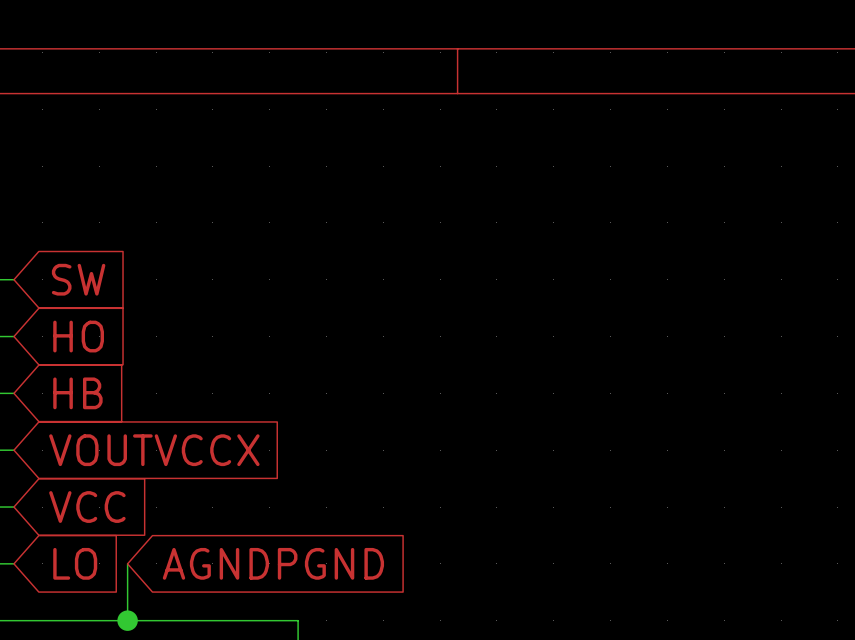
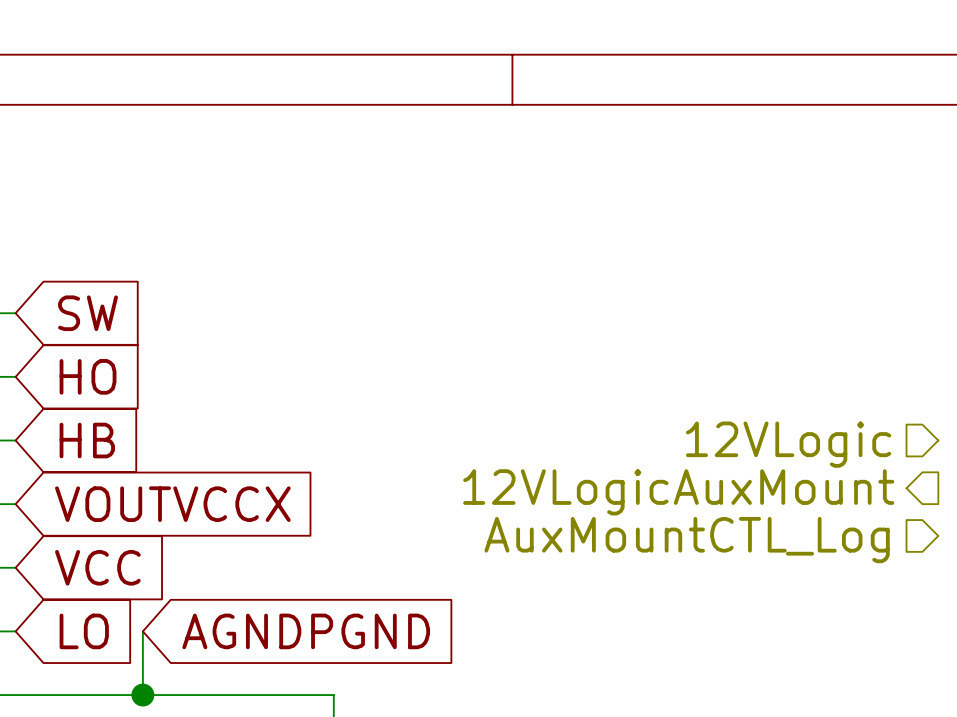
hierarchical label: none -> 12VLogic (788, 444)
hierarchical label: none -> 12VLogicAuxMount (678, 492)
hierarchical label: none -> AuxMountCTL_Log (687, 540)

